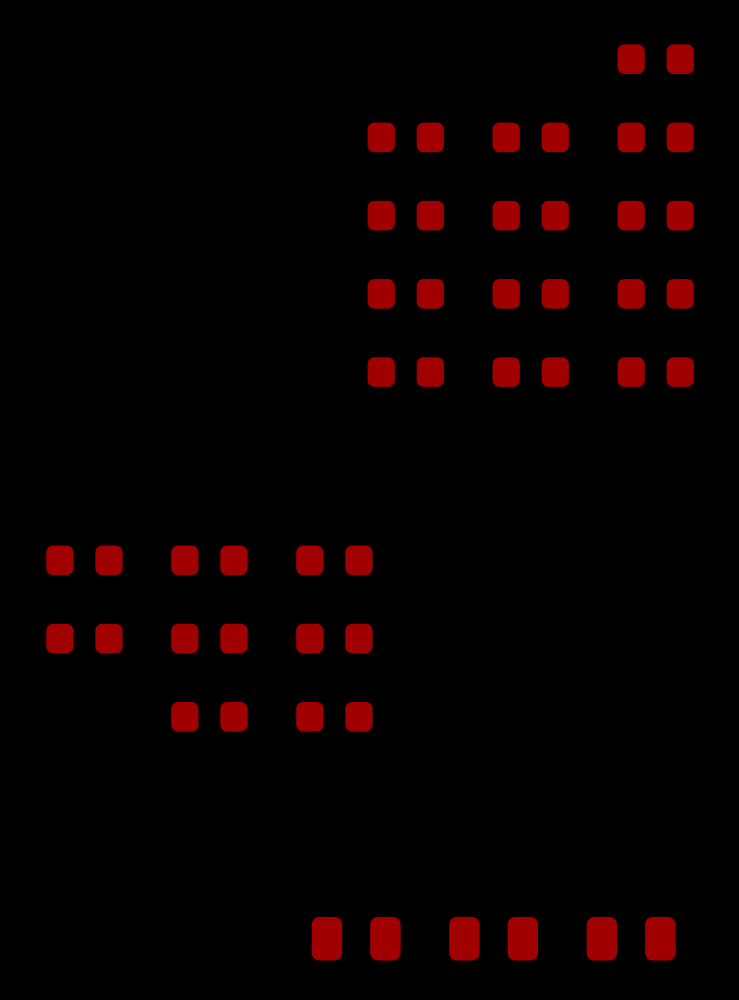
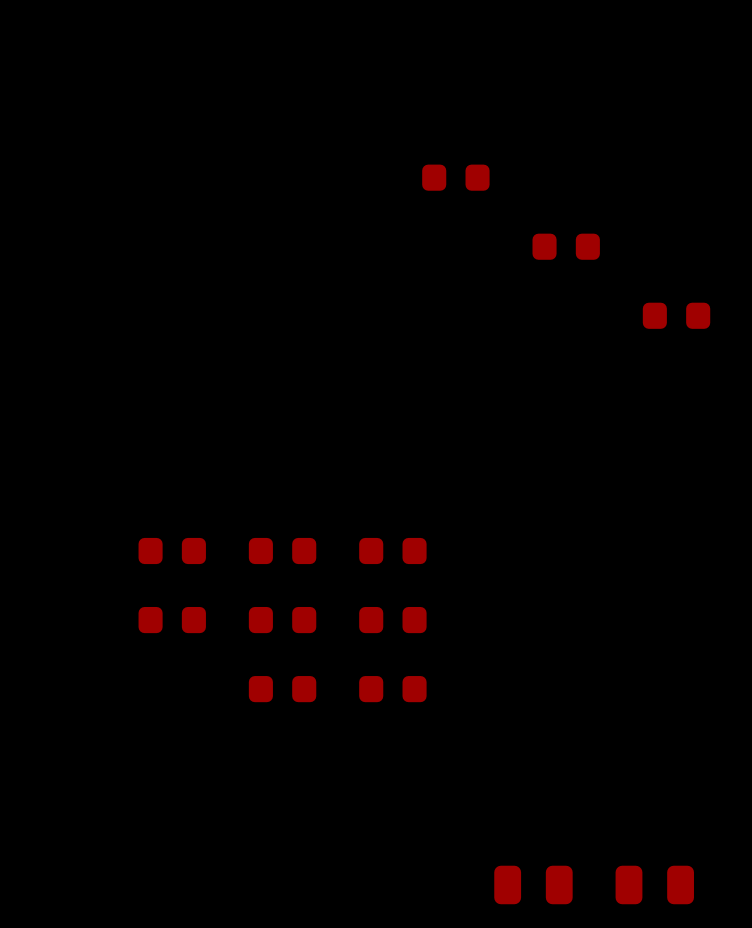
part: (655, 59) -> none
part: (530, 137) -> none
part: (655, 137) -> none
part: (405, 215) -> none
part: (655, 215) -> none
part: (405, 293) -> none
part: (530, 293) -> none
part: (405, 372) -> none
part: (530, 372) -> none
part: (655, 372) -> none
part: (356, 938) -> none

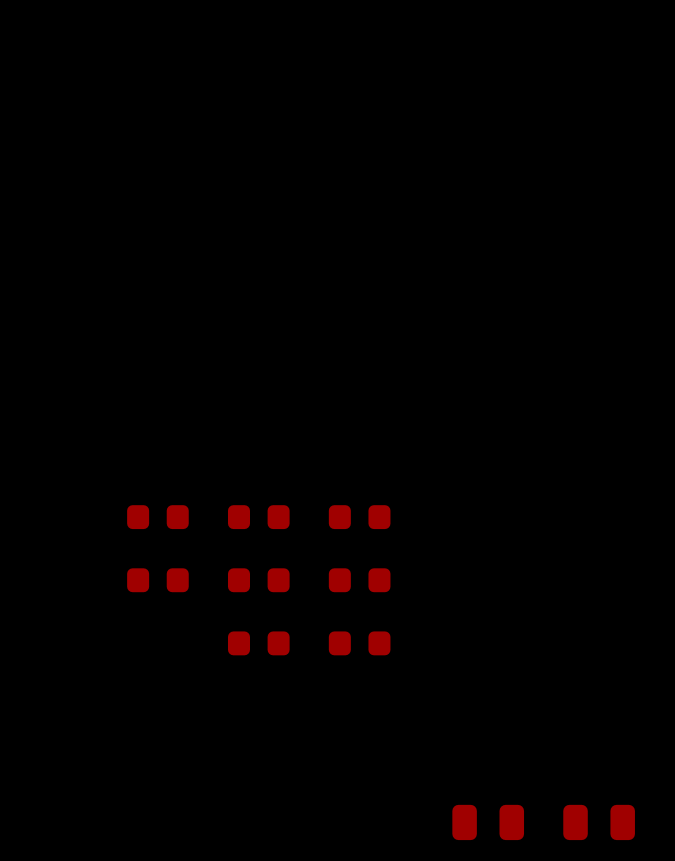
part: (455, 177) -> none
part: (566, 246) -> none
part: (676, 315) -> none

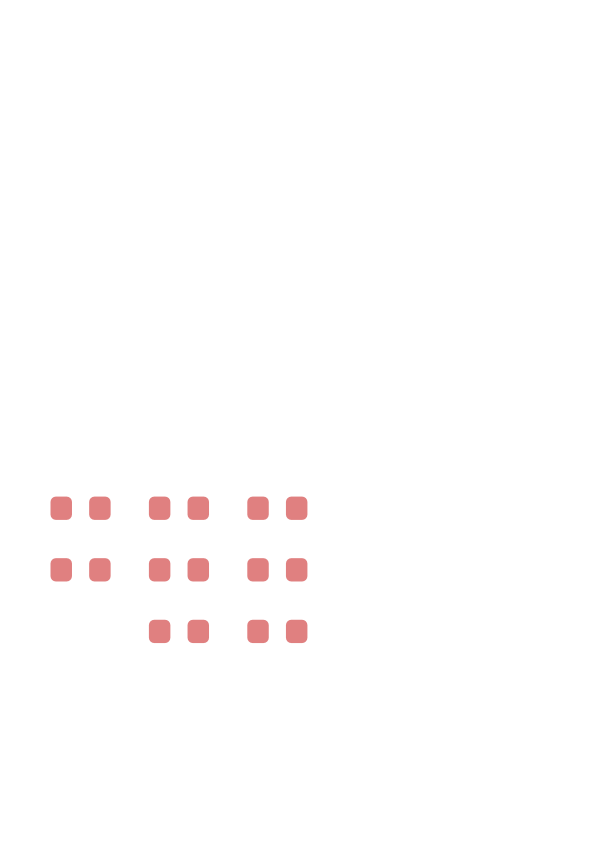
part: (488, 822) -> none
part: (599, 822) -> none

